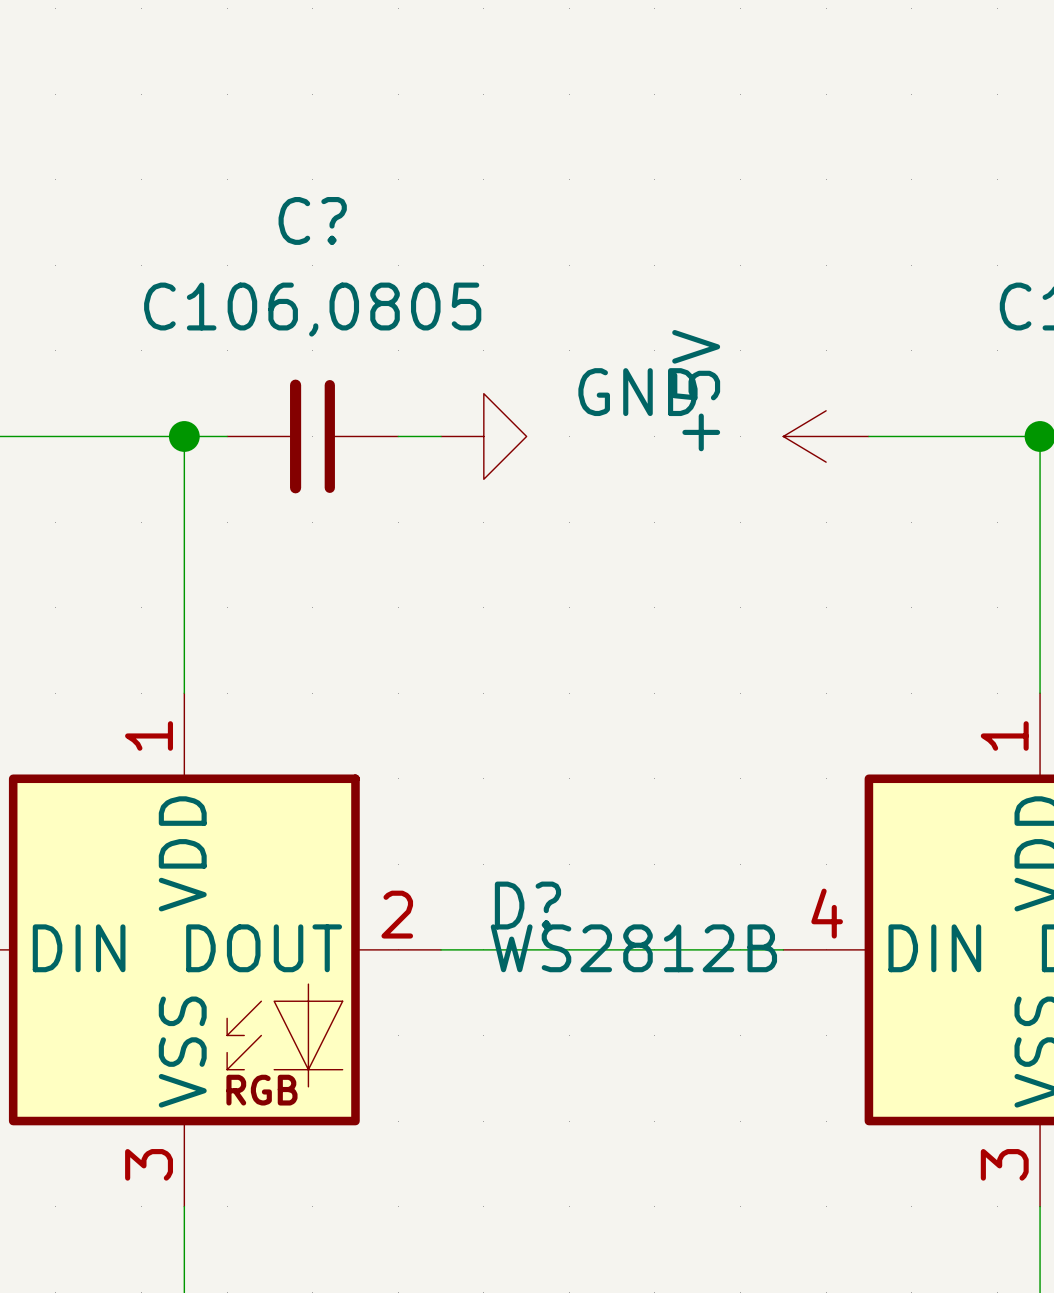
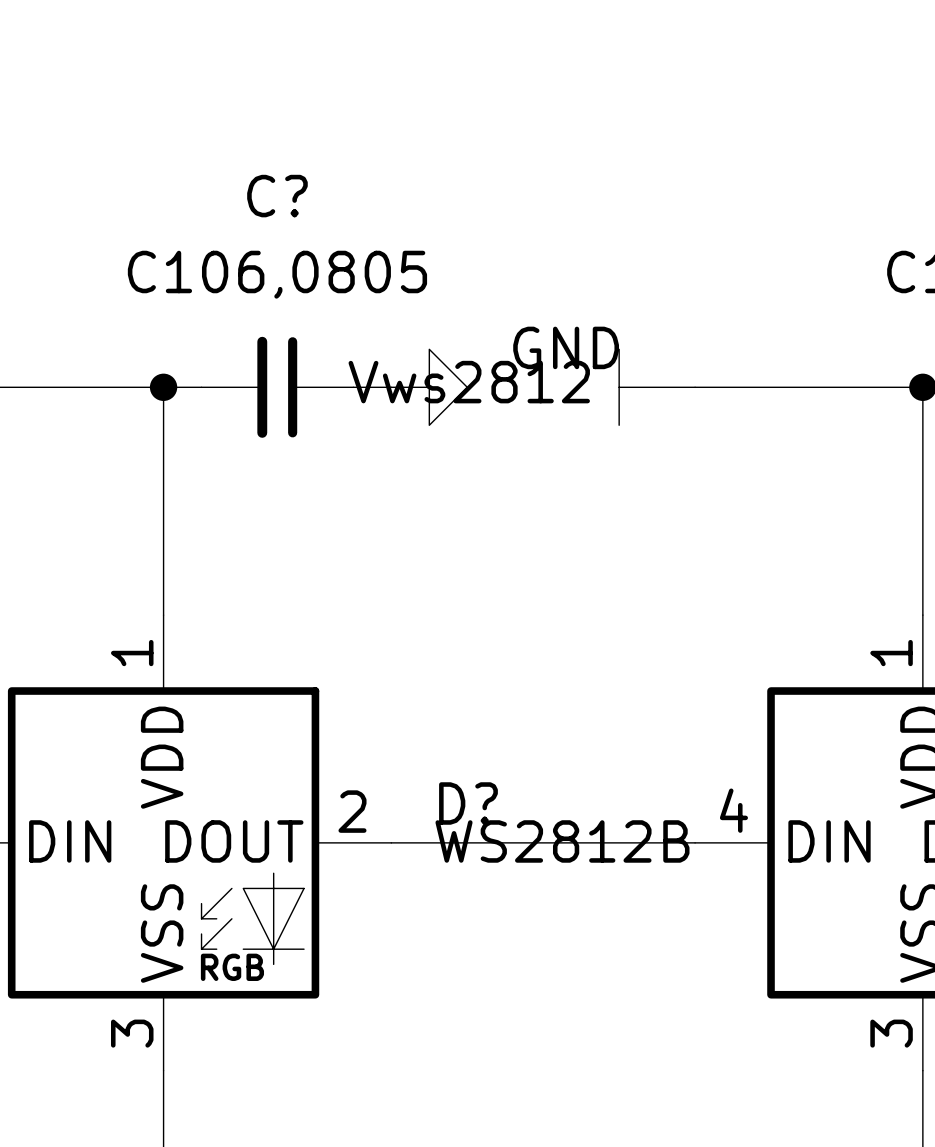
power symbol: none -> Vws2812 (657, 387)
power symbol: +5V (826, 436) -> none

